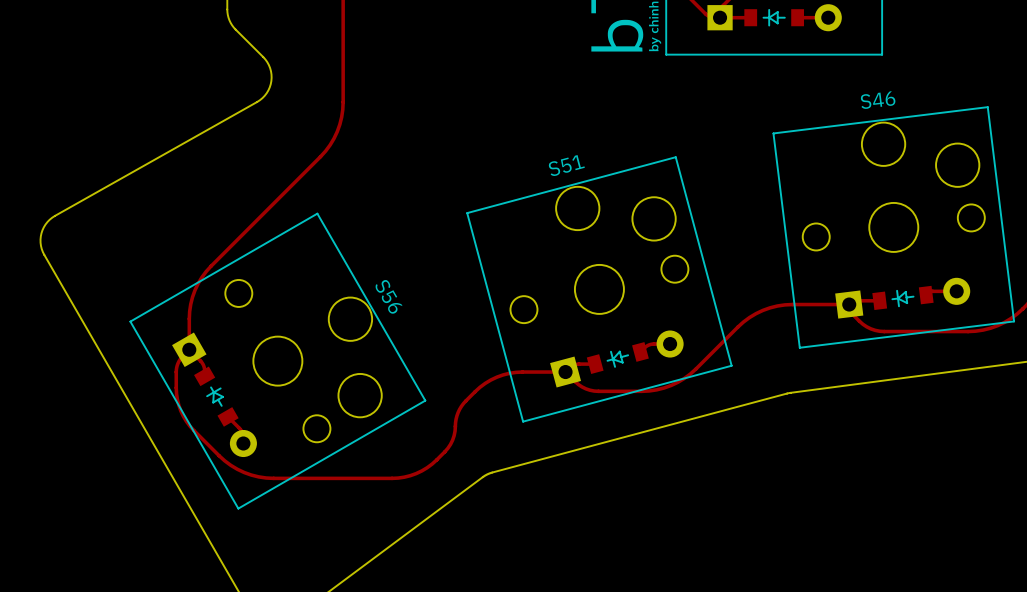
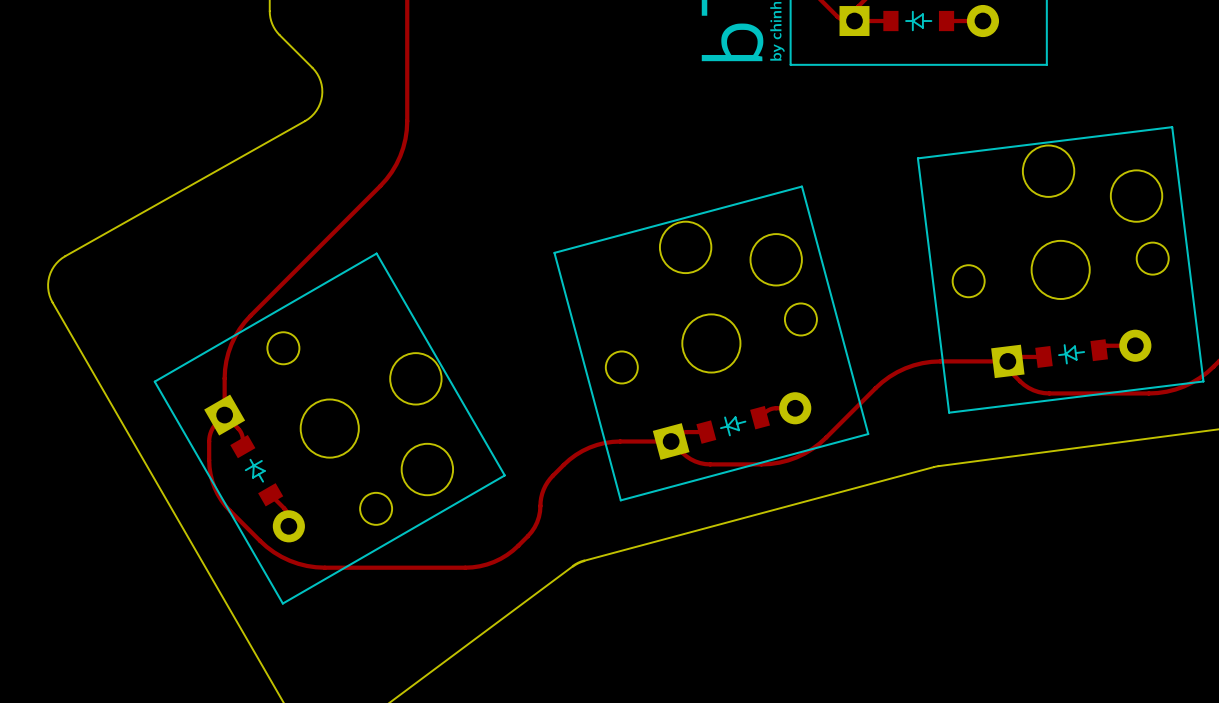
S46 name: S46 (878, 100) -> none
S51 name: S51 (566, 165) -> none
S56 name: S56 (389, 296) -> none

